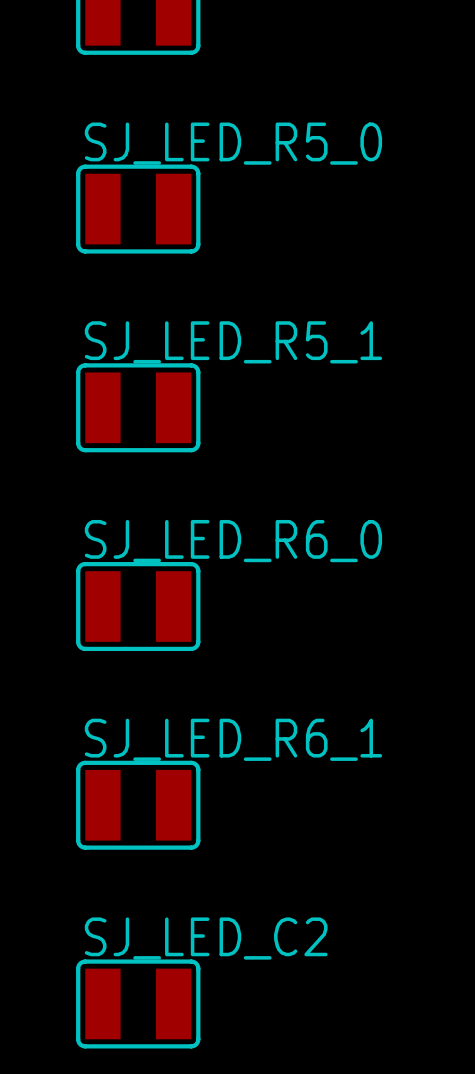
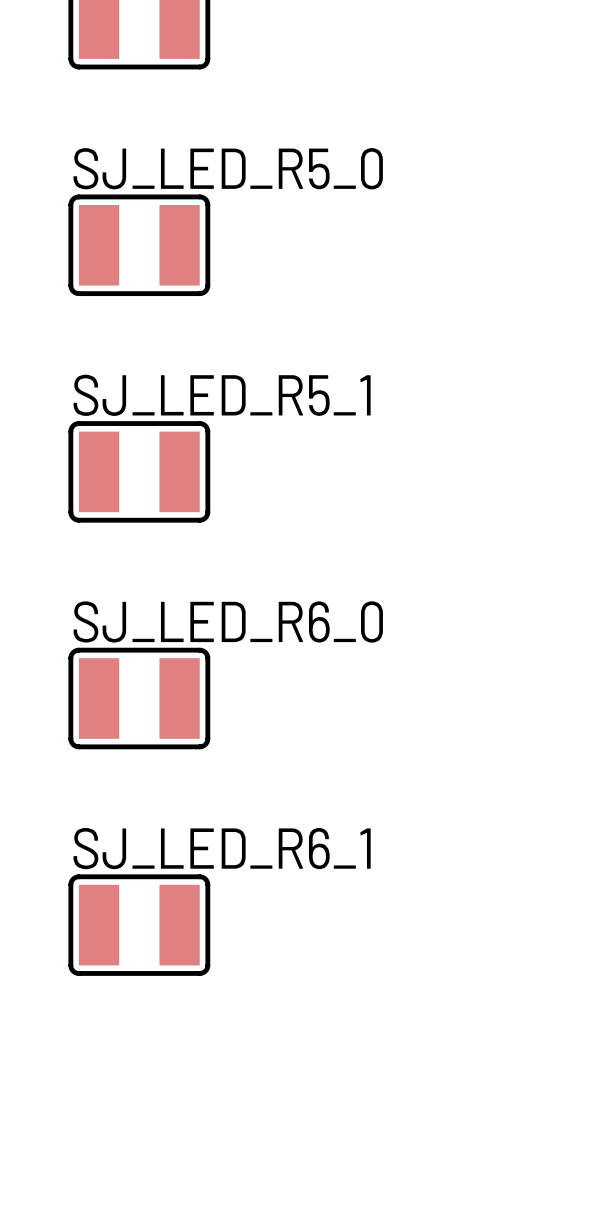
SJ_LED_C2: (138, 1003) -> none

